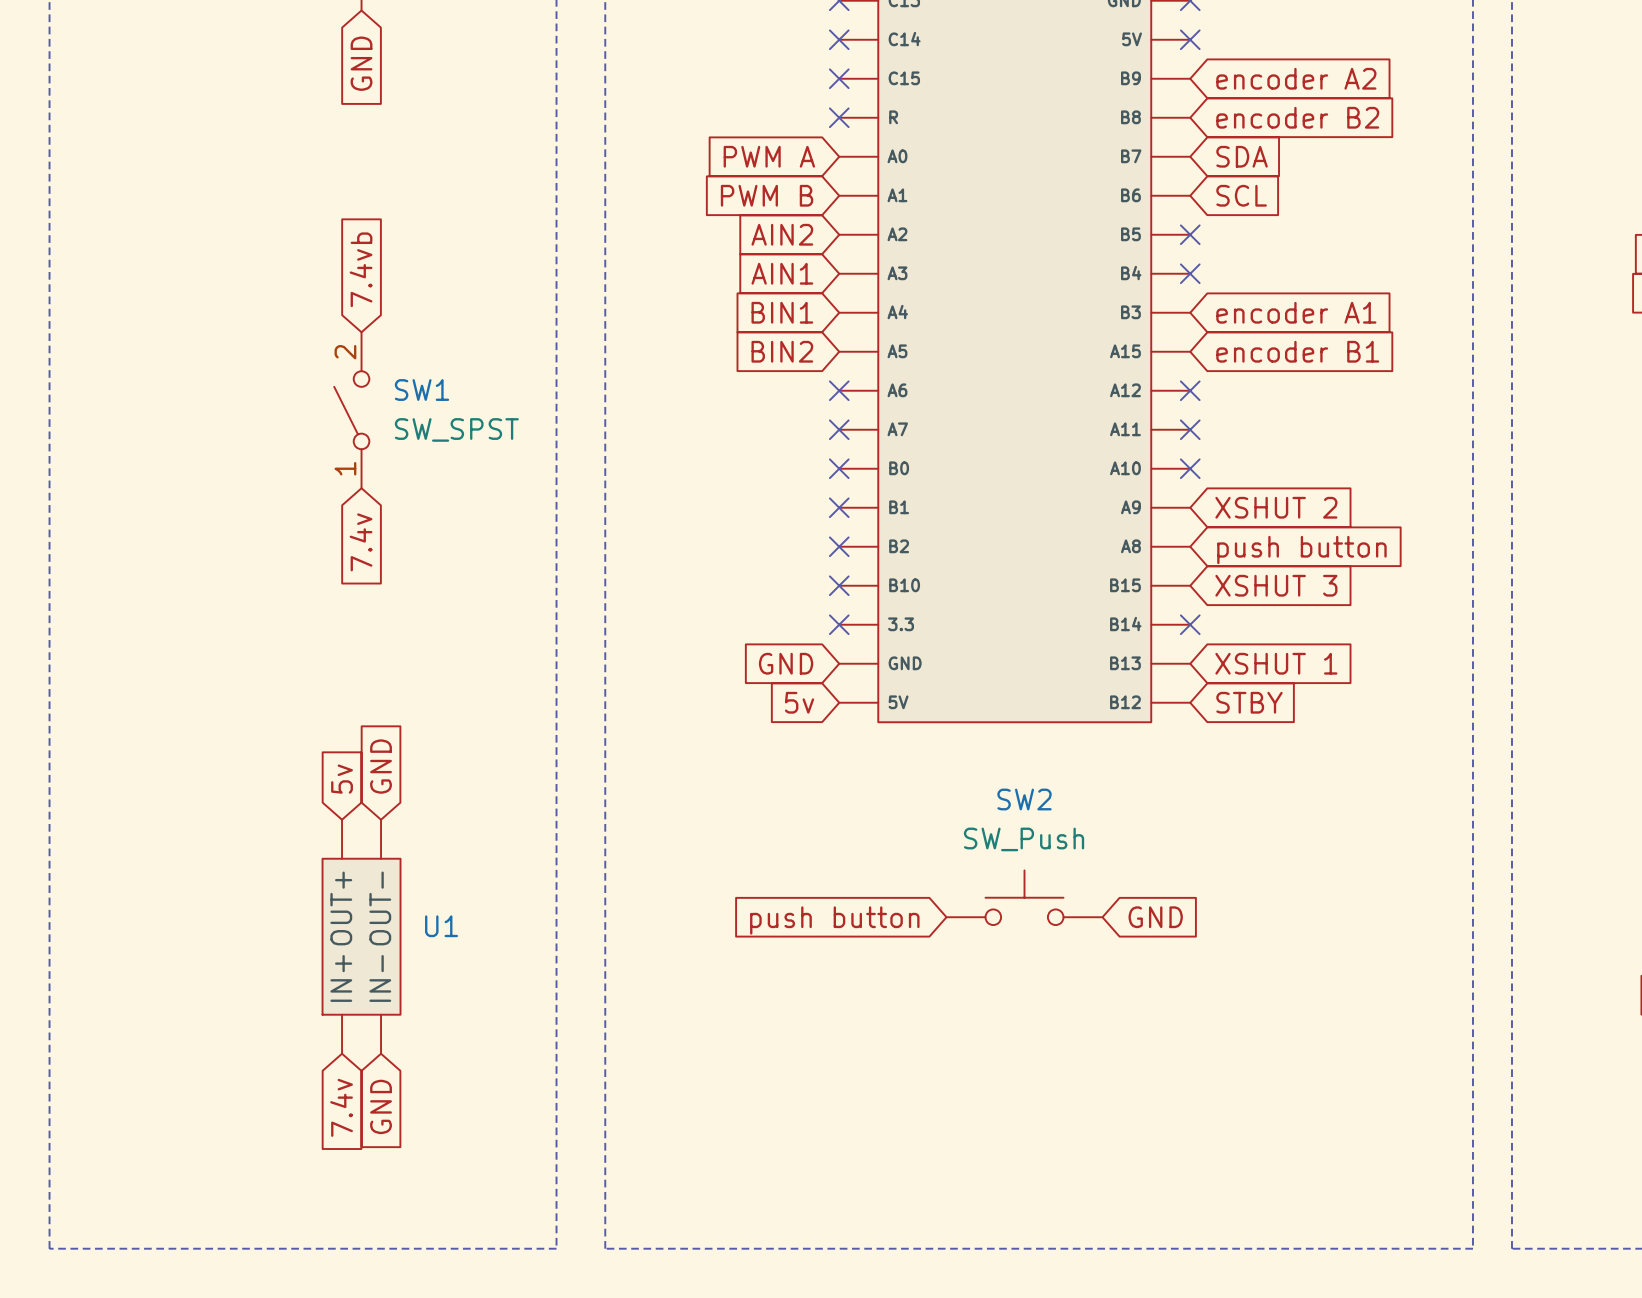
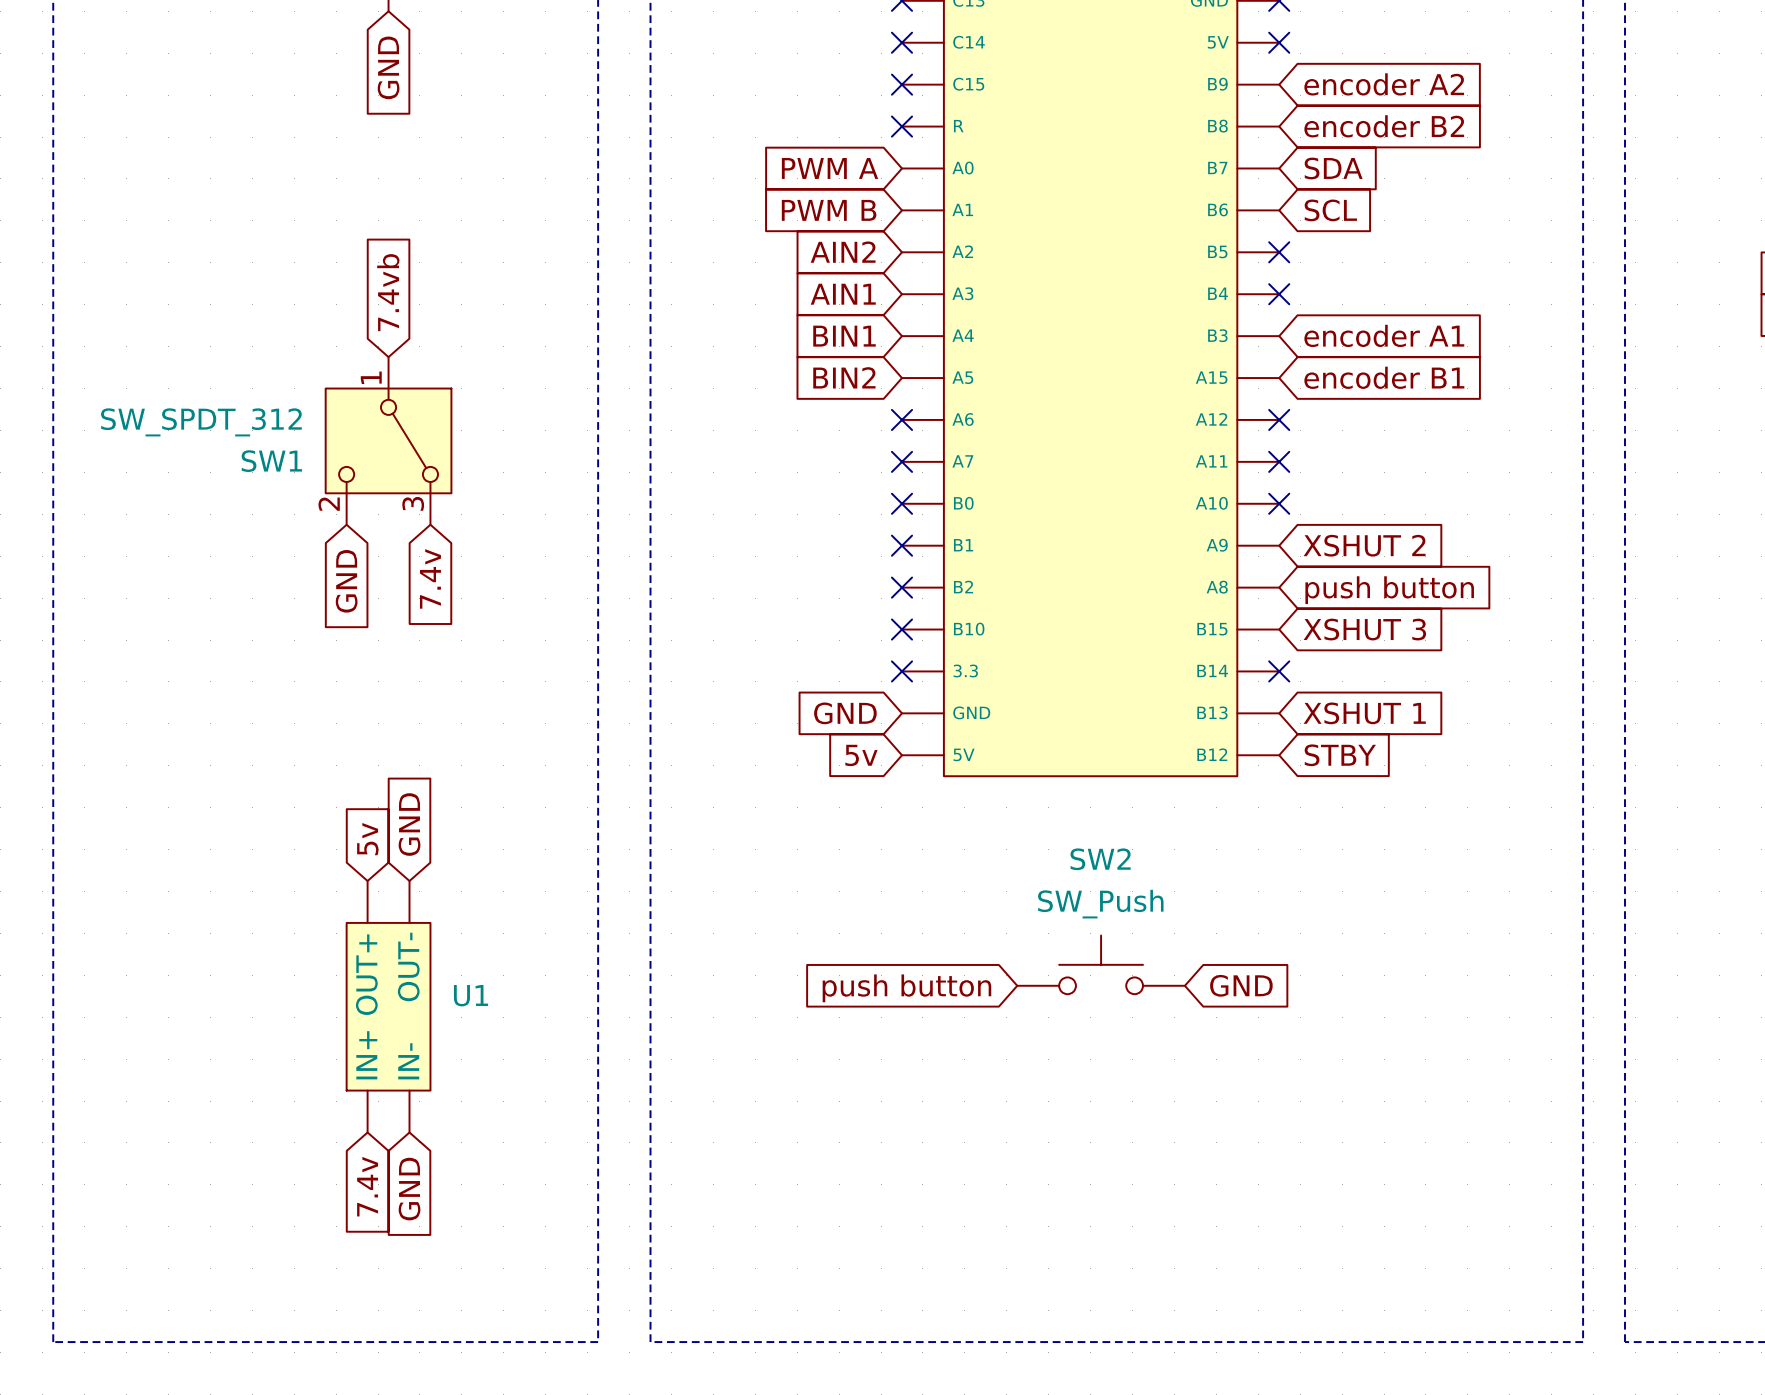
SW1 symbol: [334, 332, 370, 489] -> [325, 357, 452, 525]
SW1 name position: SW1 (422, 390) -> SW1 (271, 461)
SW1 value: SW_SPST (456, 429) -> SW_SPDT_312 (201, 422)
global label: none -> GND (346, 581)
global label position: 7.4v (361, 542) -> 7.4v (430, 578)

